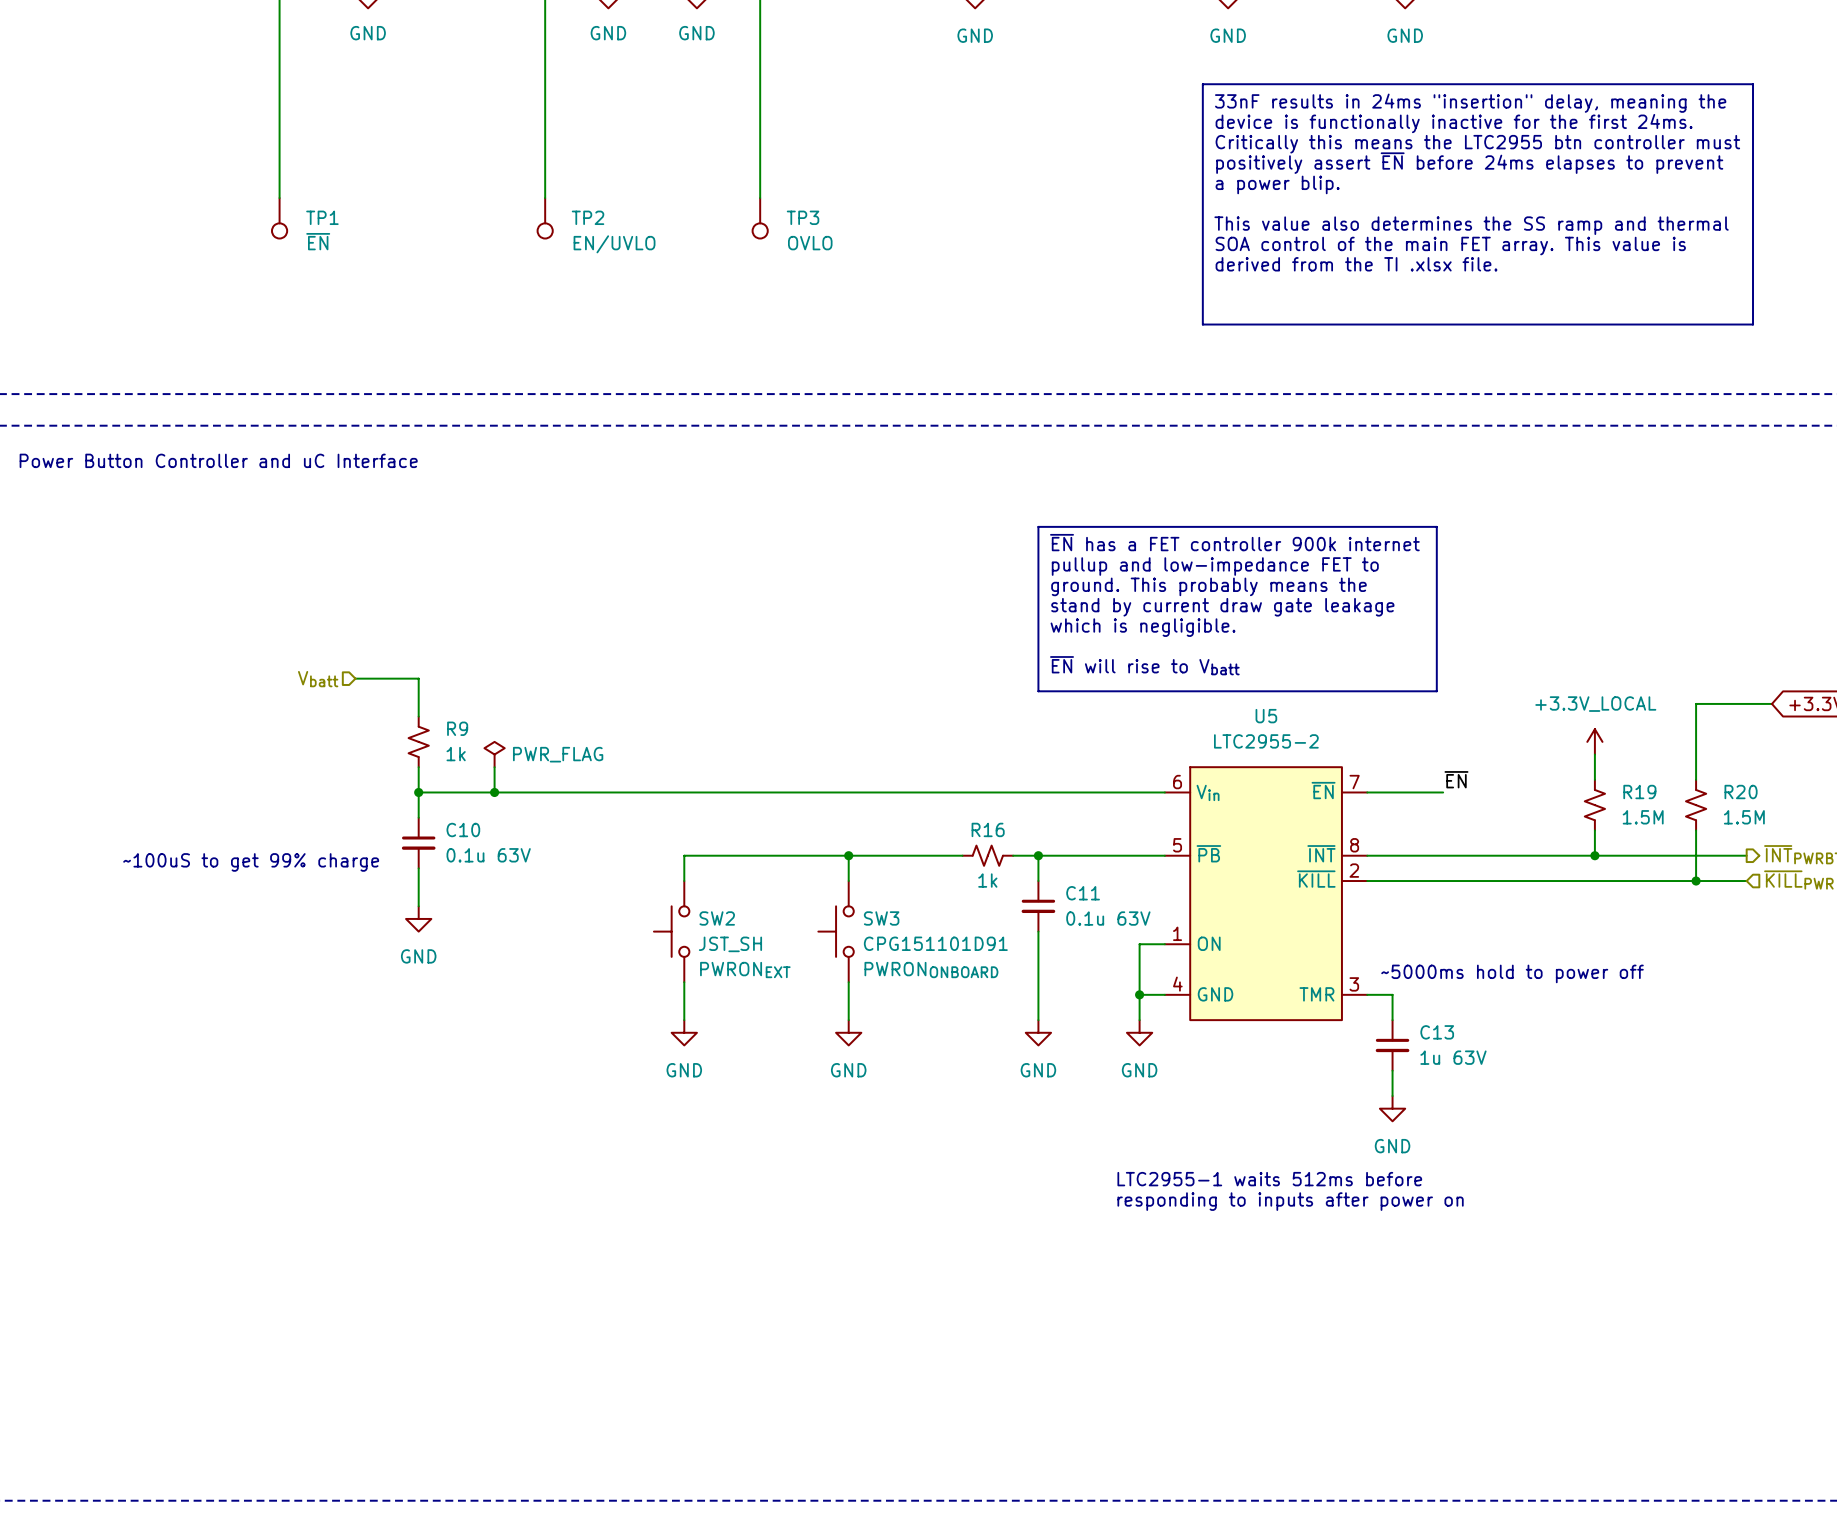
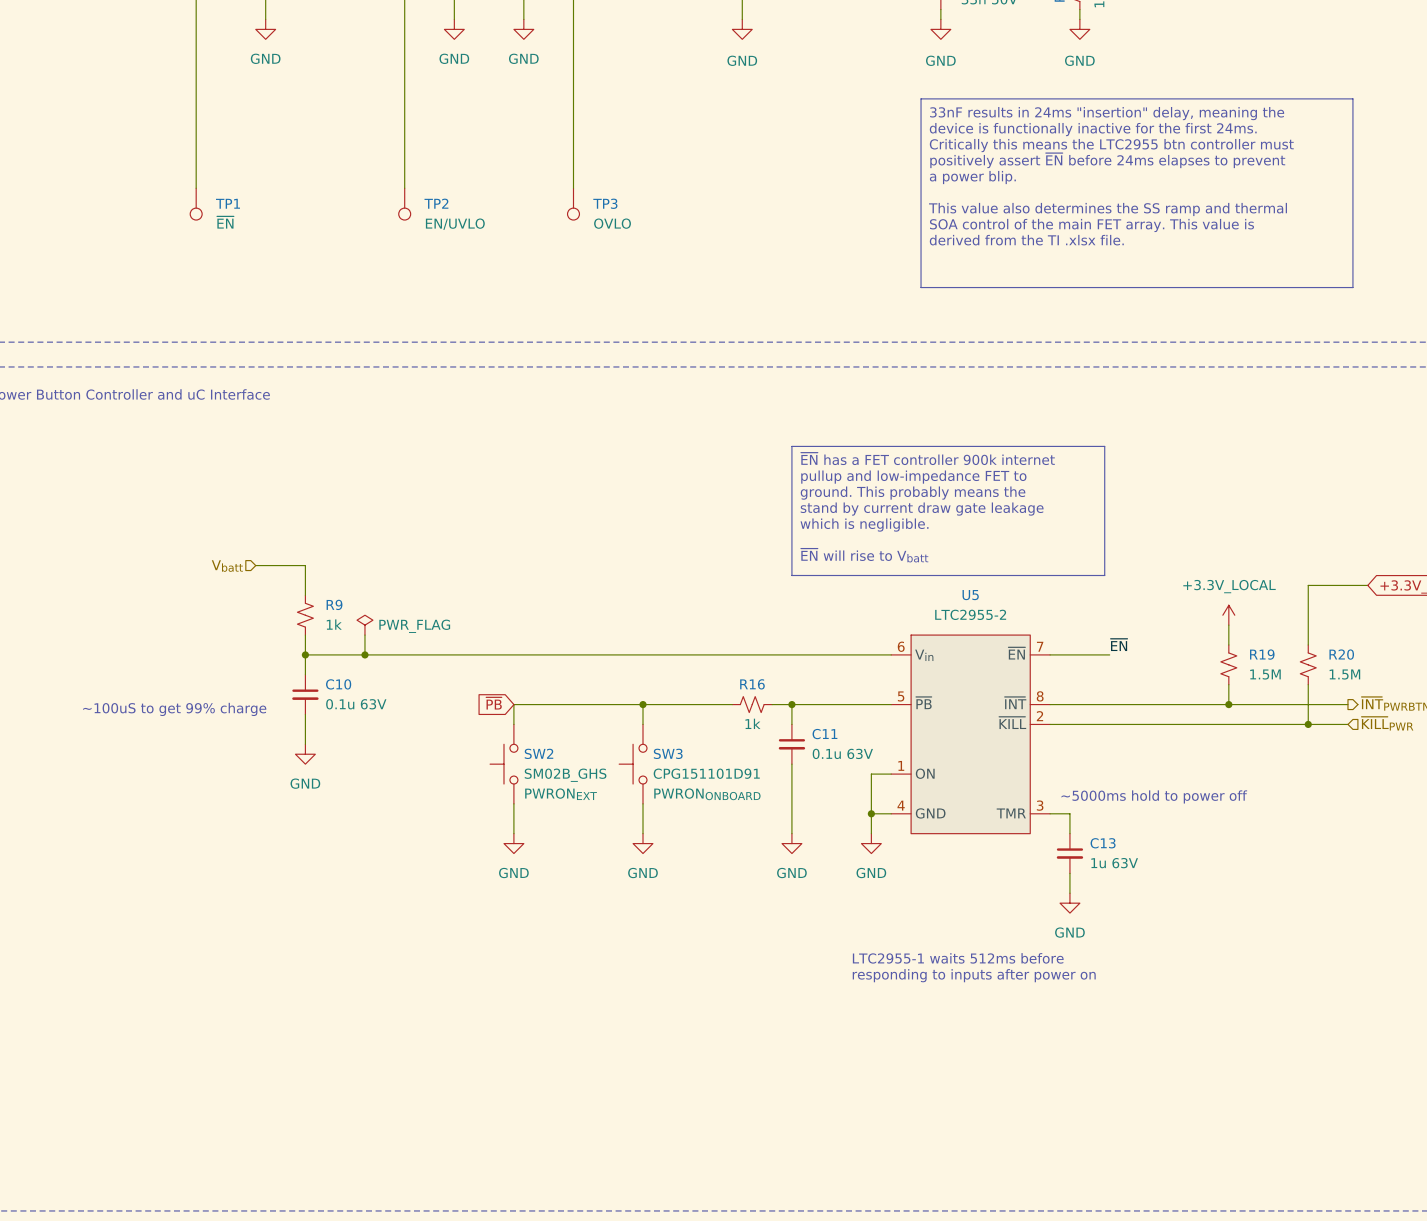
global label: none -> ~{PB} (493, 703)
SW2 value: JST_SH (730, 944) -> SM02B_GHS (565, 775)

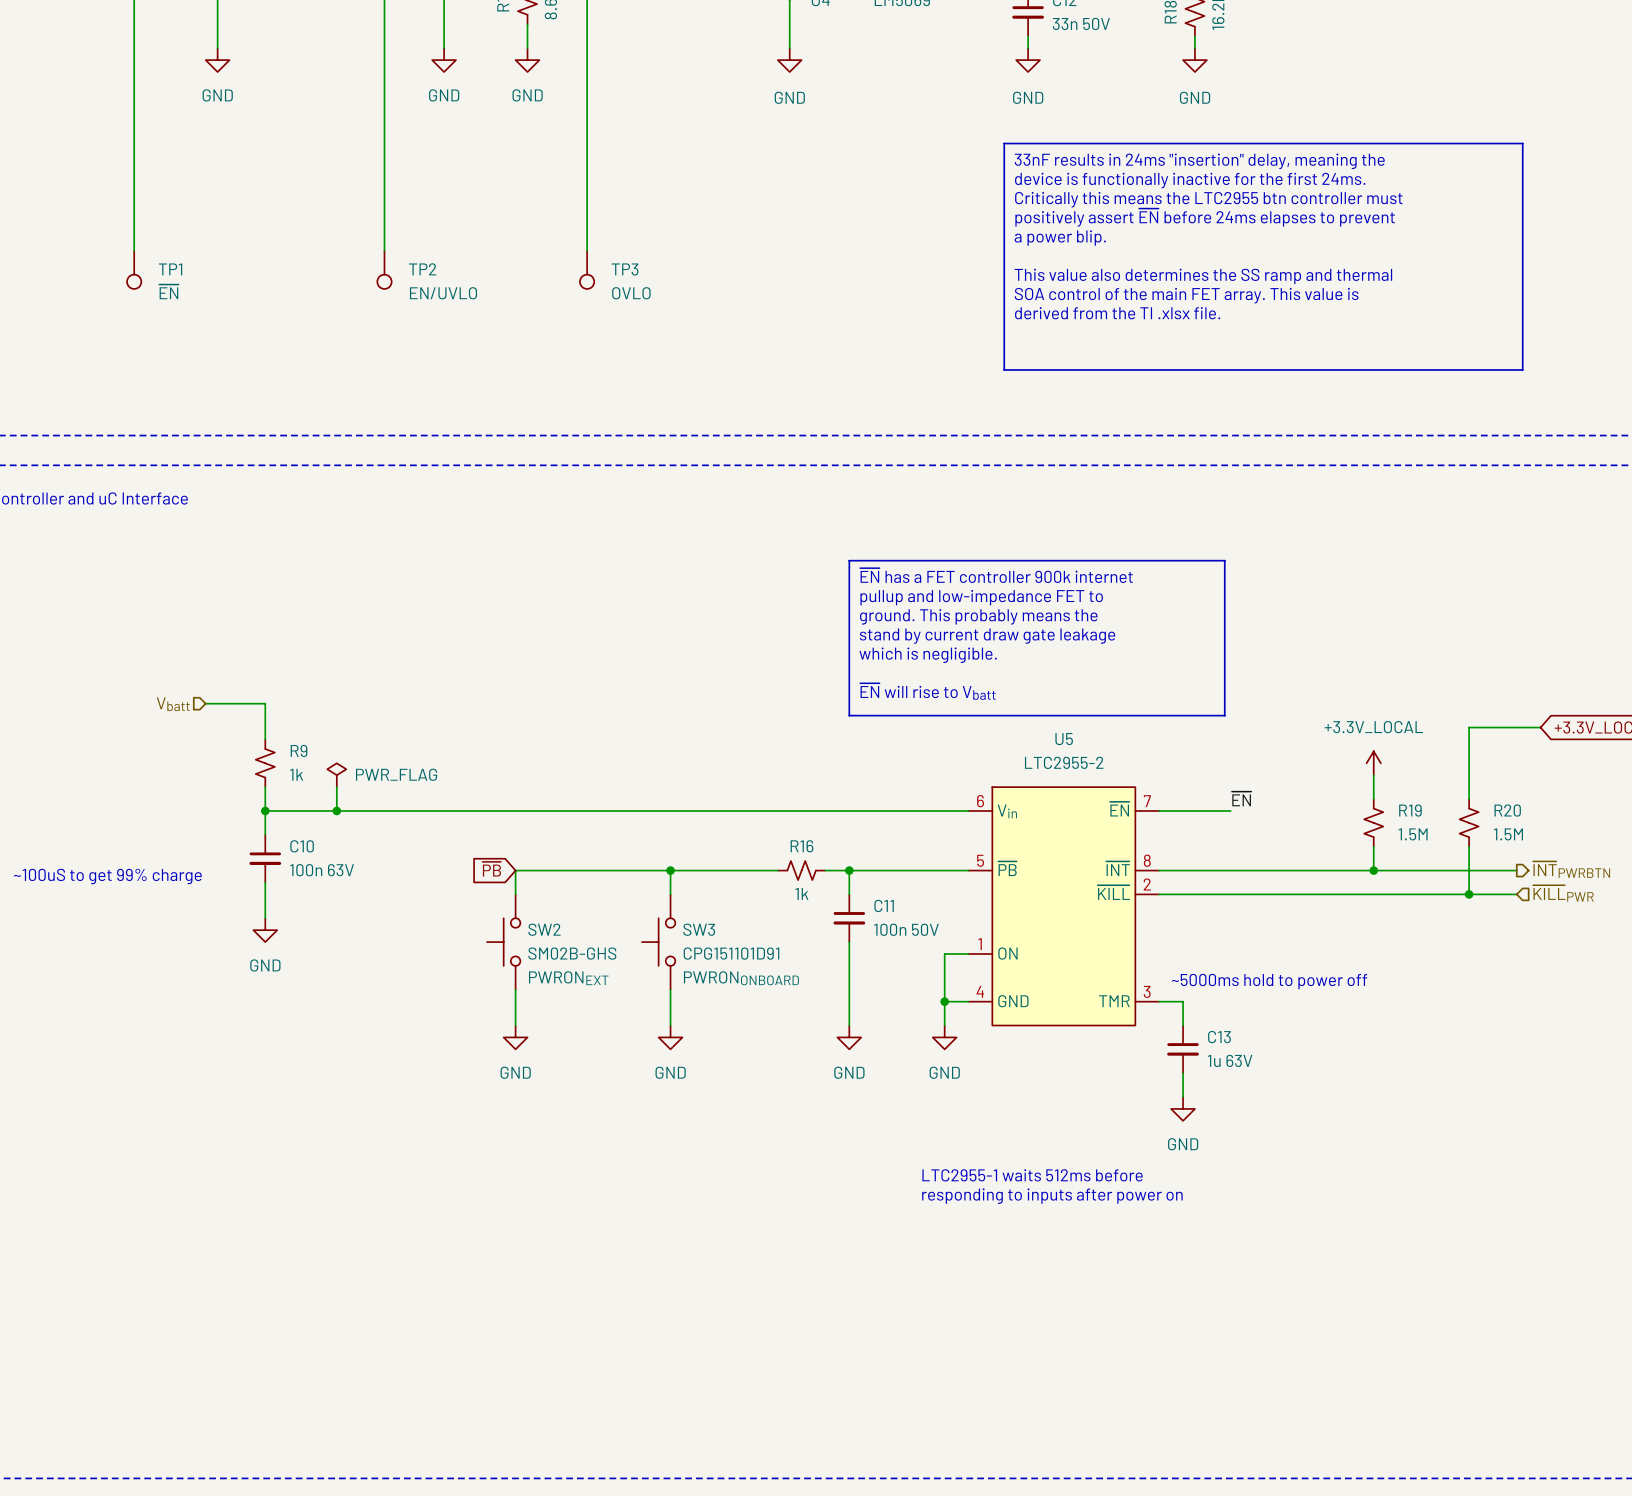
C10 value: 0.1u 63V (356, 704) -> 100n 63V (322, 870)
C11 value: 0.1u 63V (842, 753) -> 100n 50V (906, 929)
SW2 value: SM02B_GHS (565, 775) -> SM02B-GHS (572, 953)

